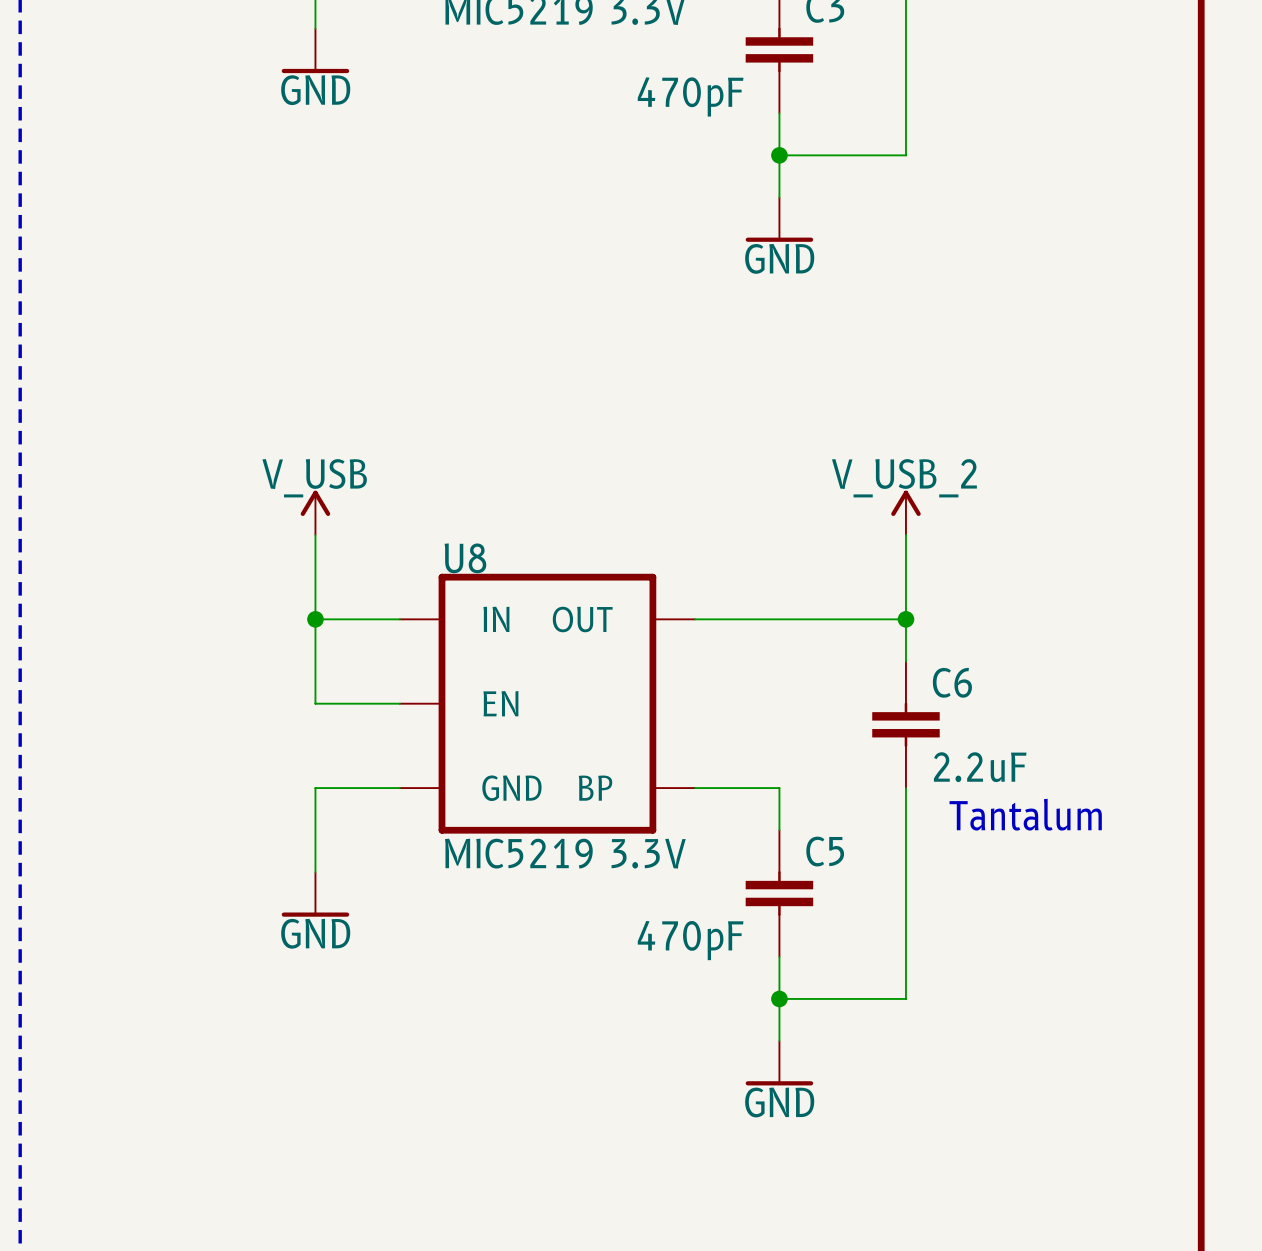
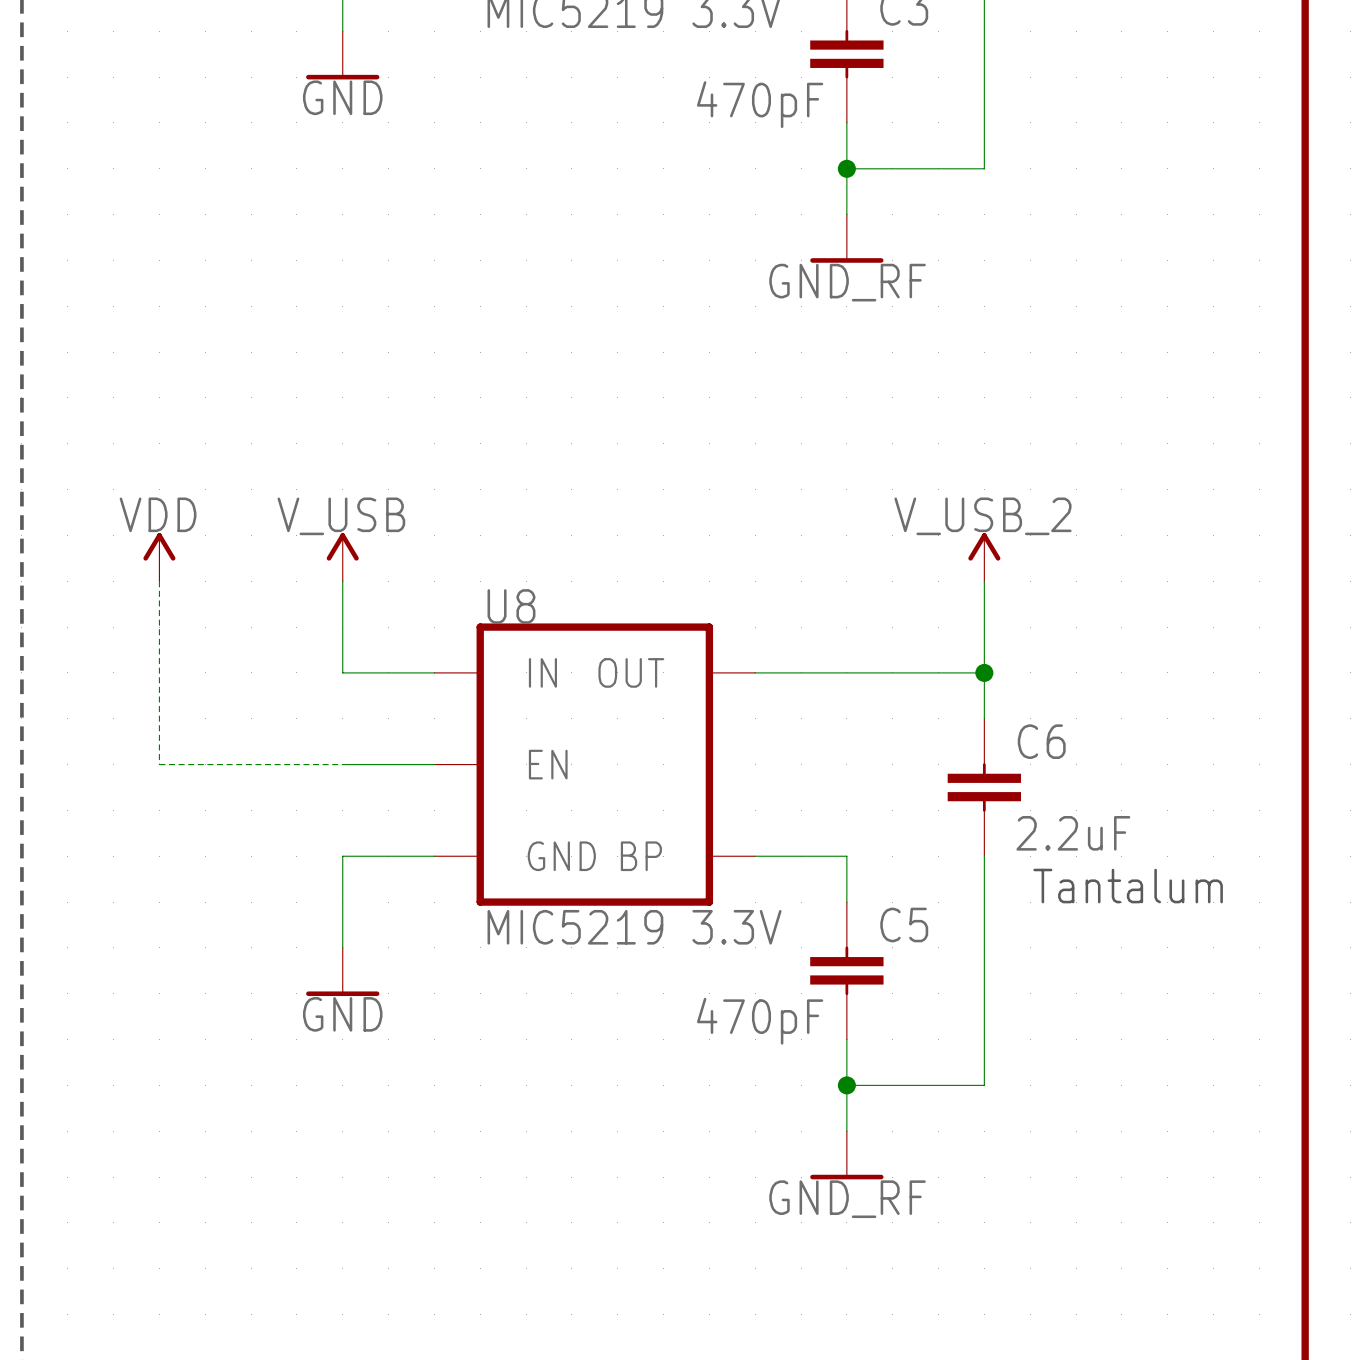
power symbol: GND (779, 219) -> GND_RF (846, 238)
power symbol: none -> VDD (159, 557)
wire: (315, 619) (315, 703) -> (159, 581) (159, 764) (342, 764)
junction: (315, 619) -> none
power symbol: GND (779, 1063) -> GND_RF (846, 1155)

